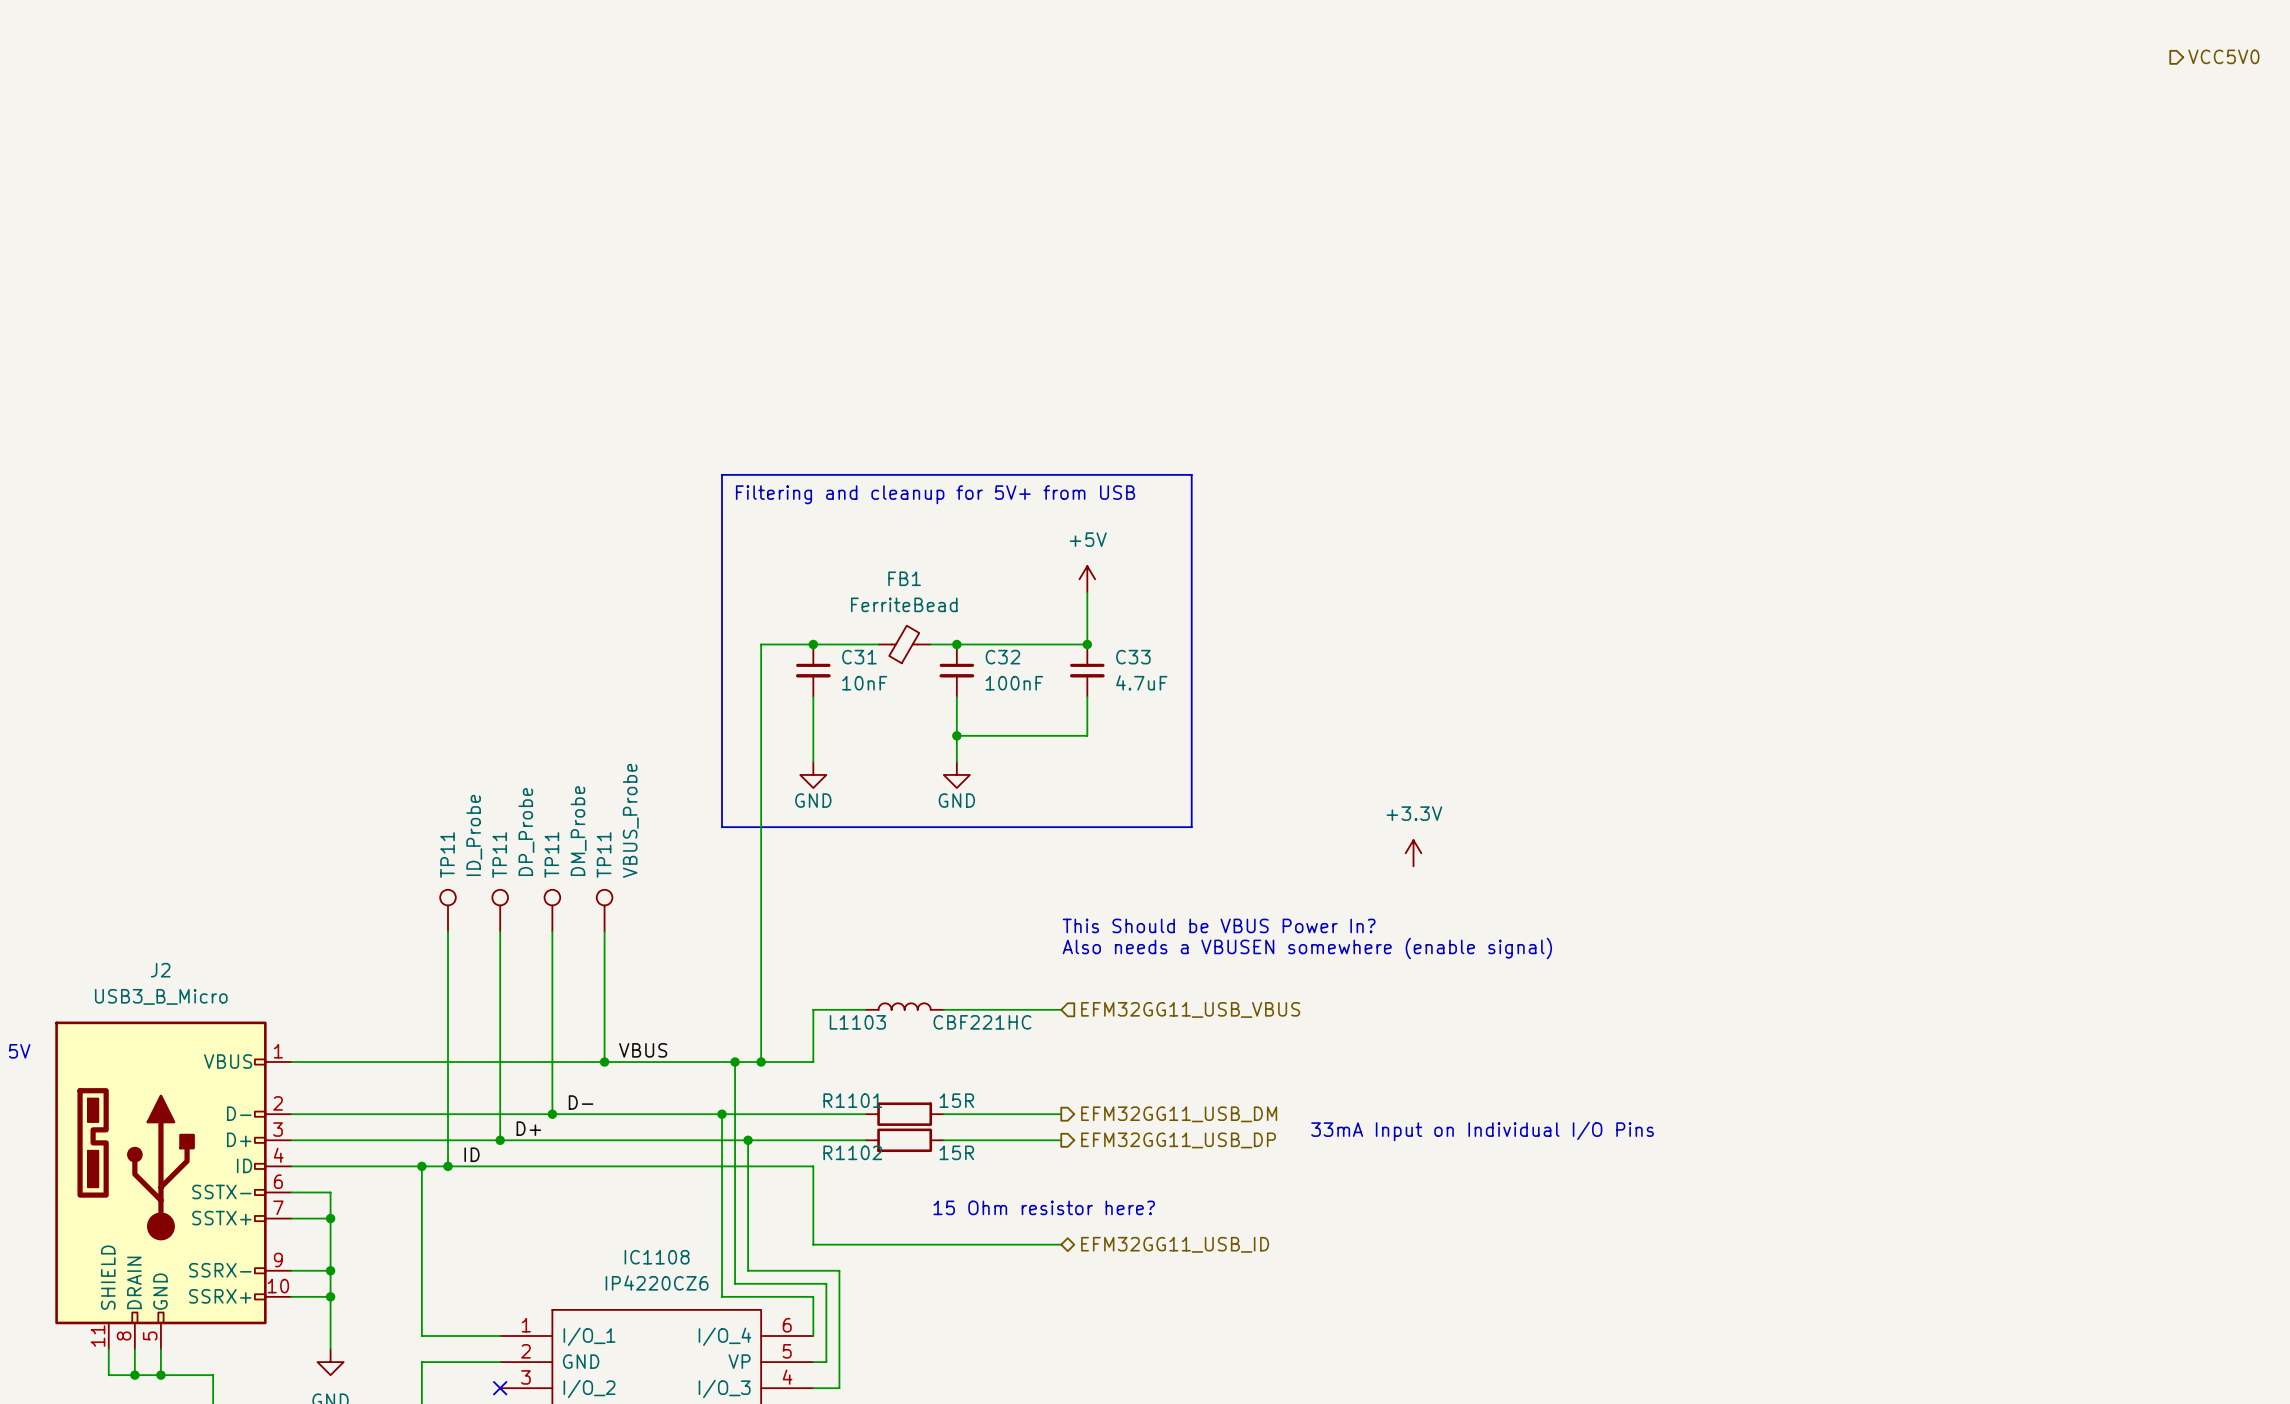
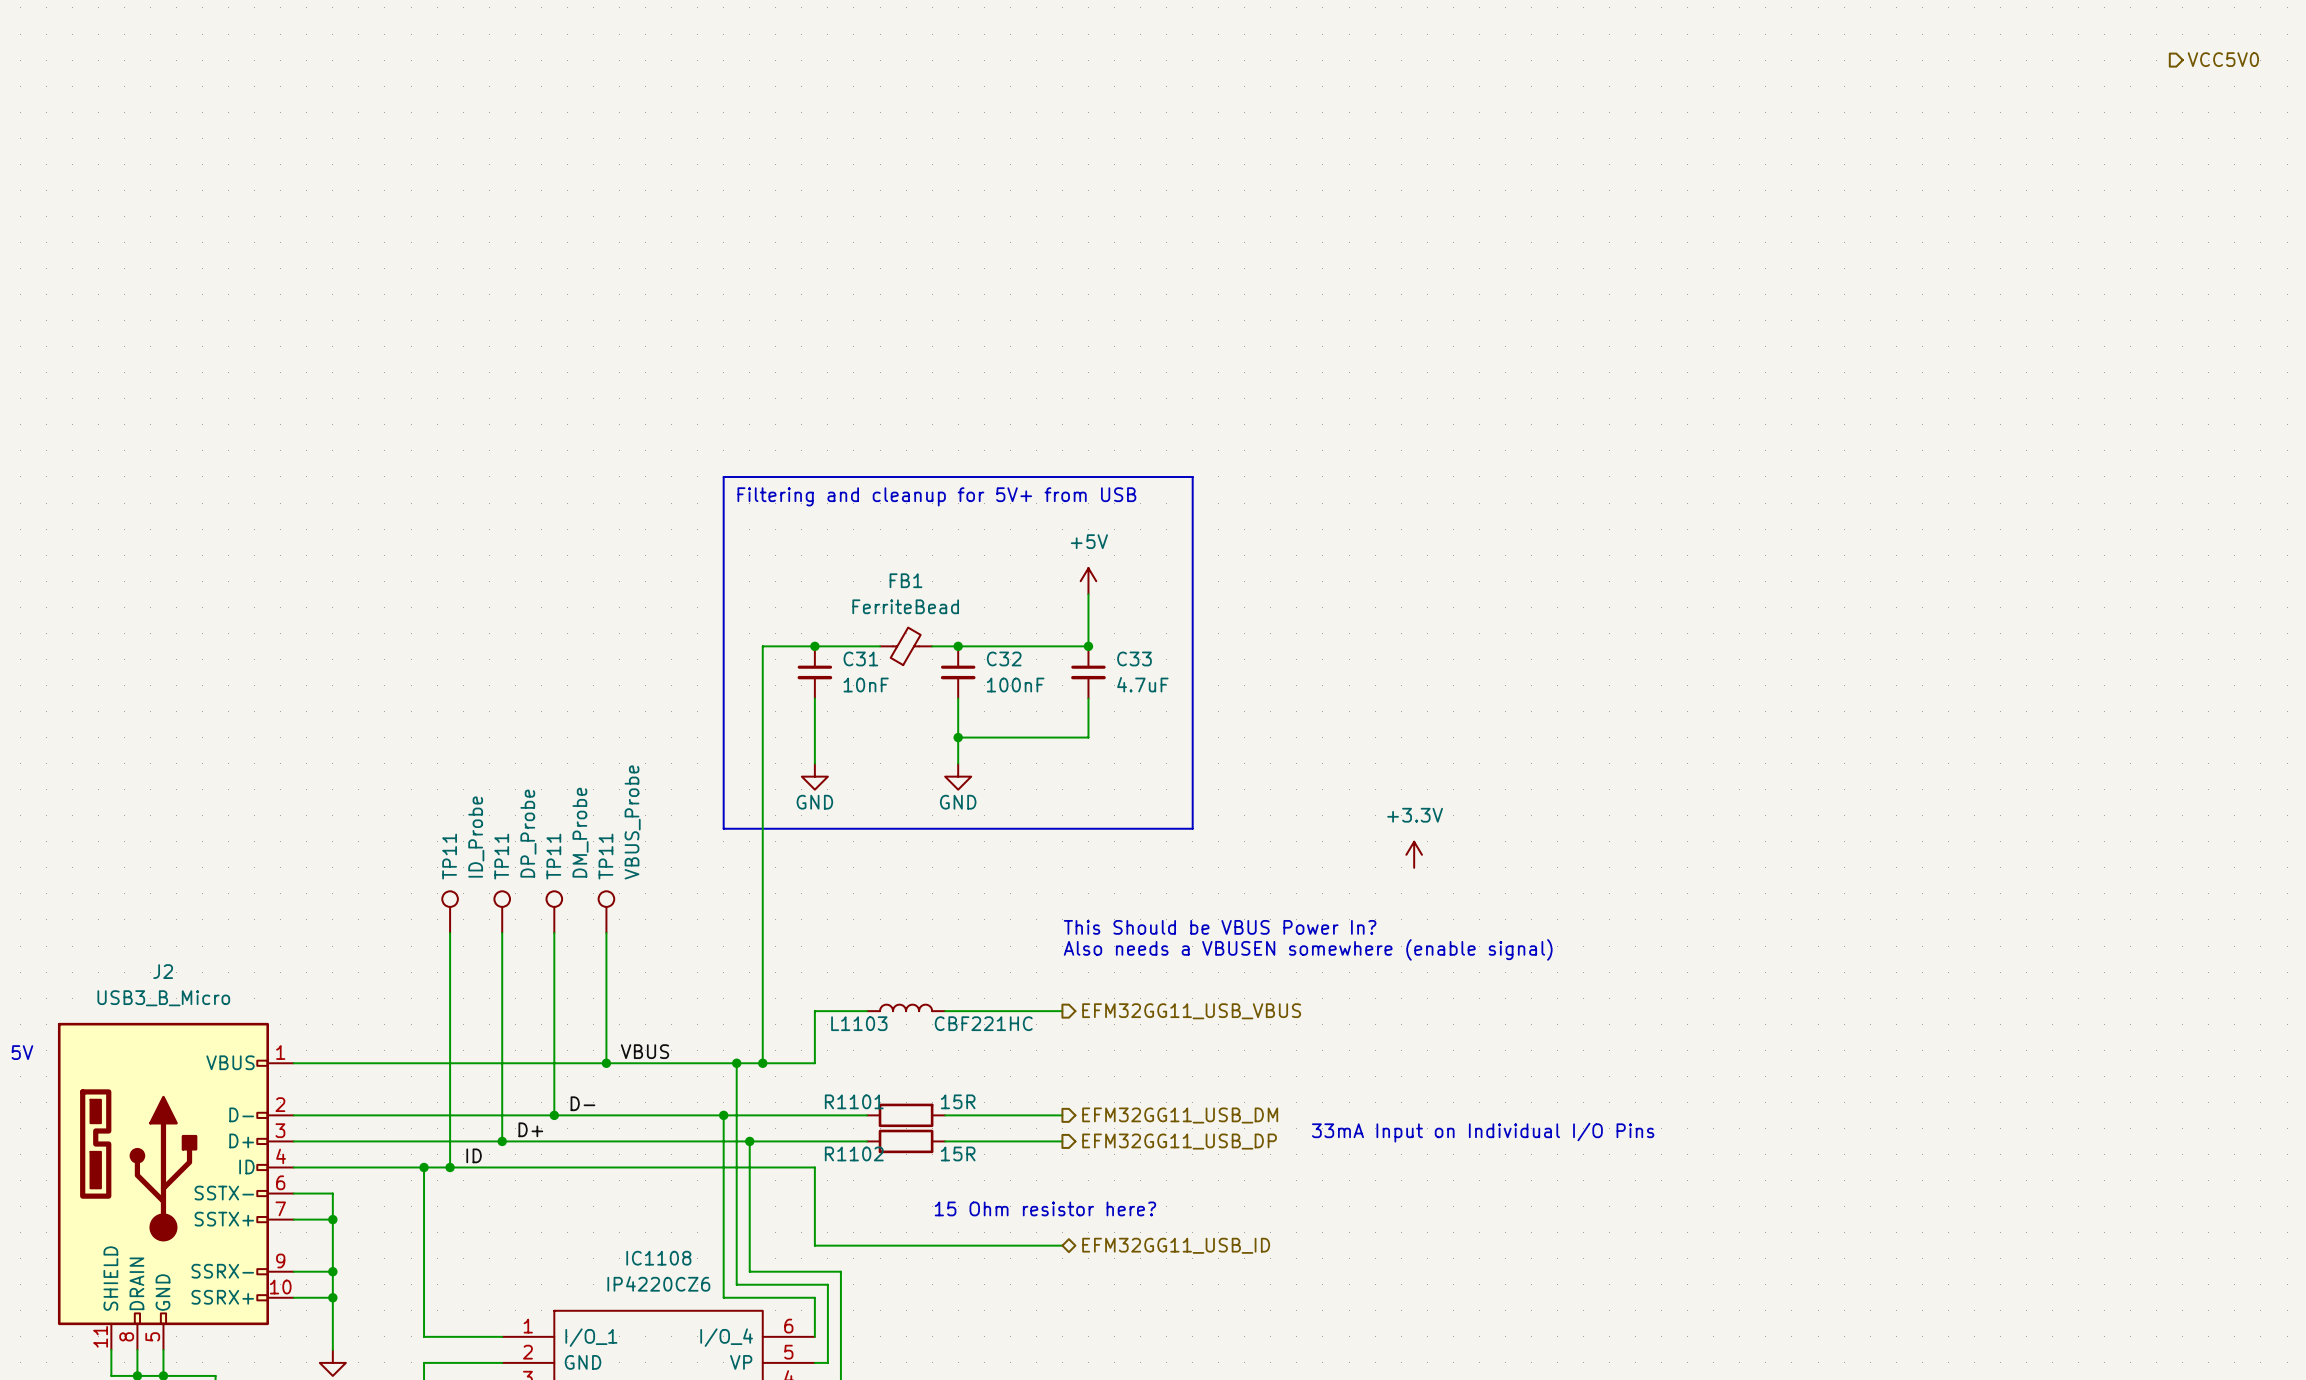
hierarchical label shape: input (1190, 1009) -> output (1191, 1011)

